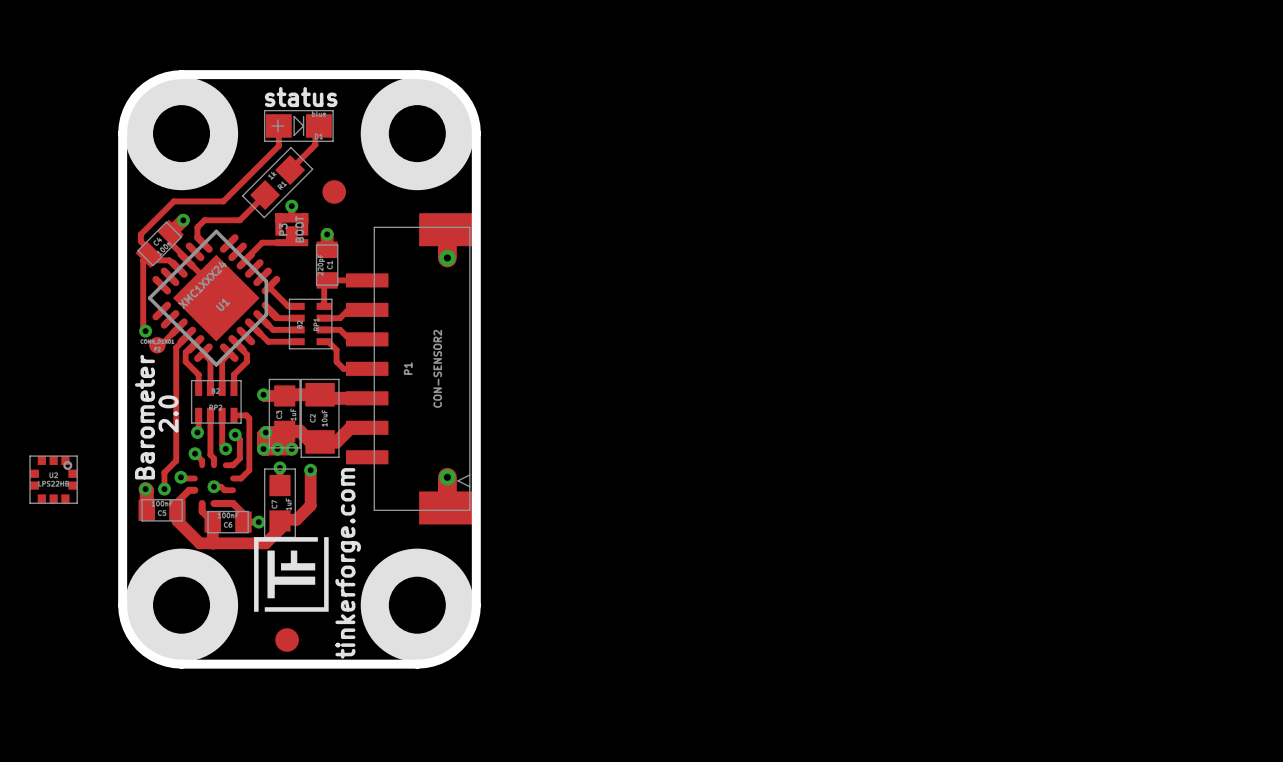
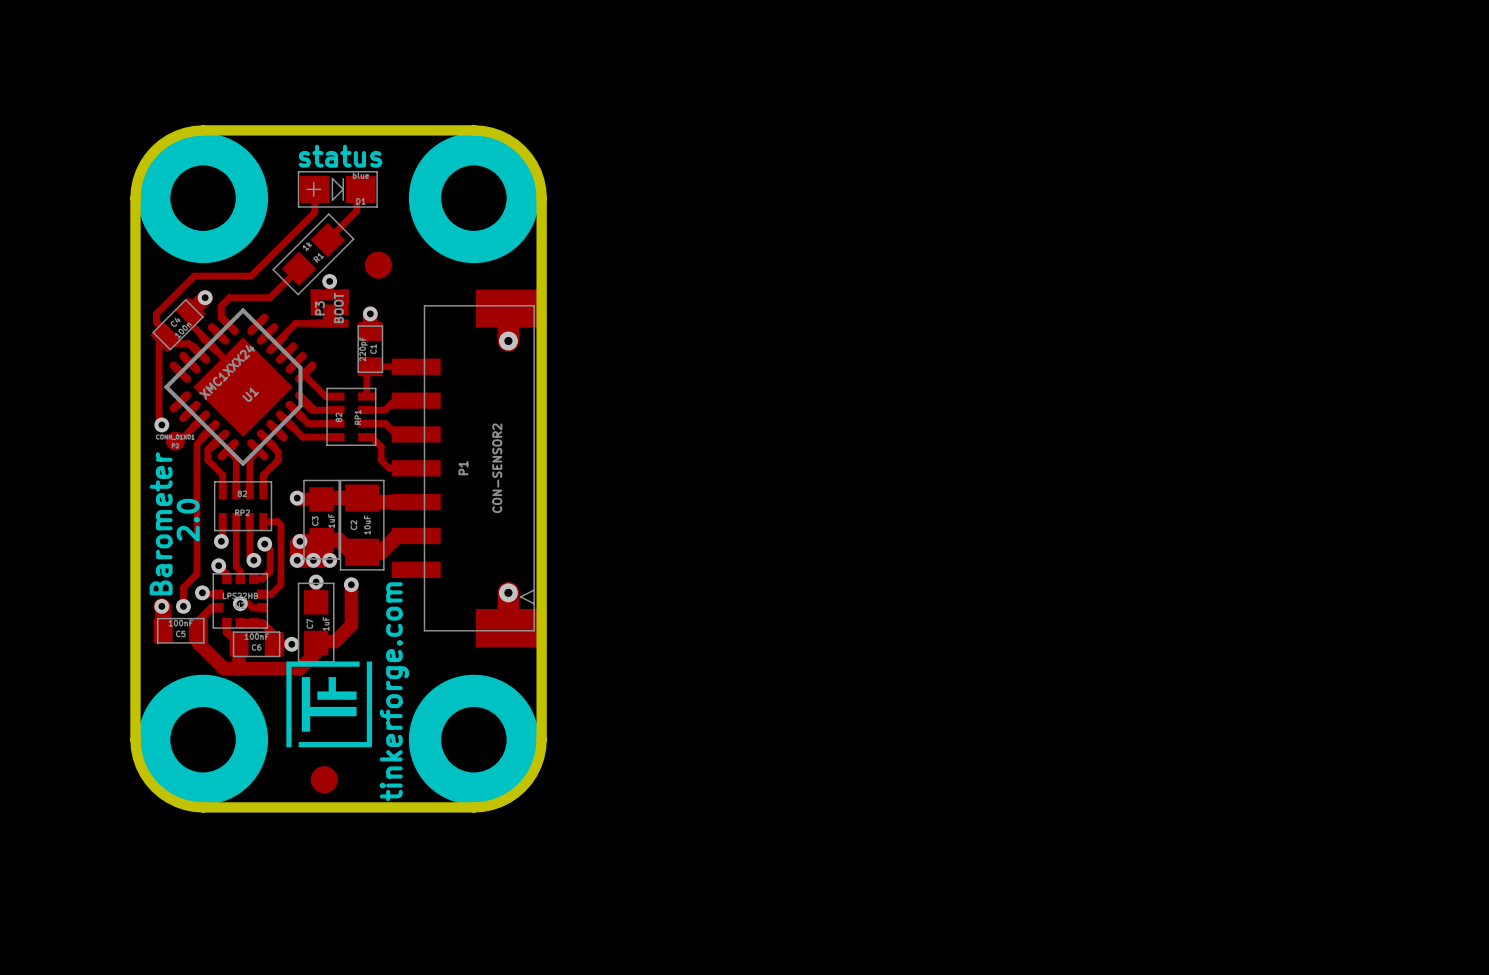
part footprint: [29, 455, 78, 504] -> [212, 573, 269, 629]

